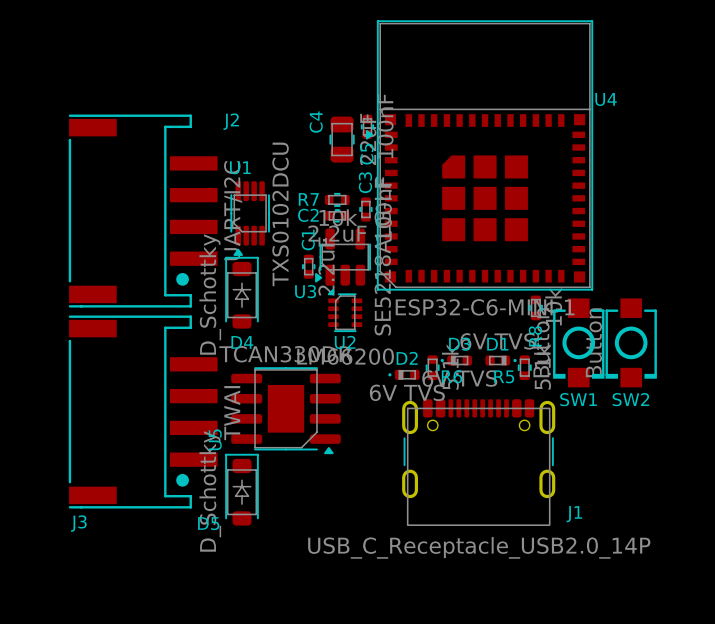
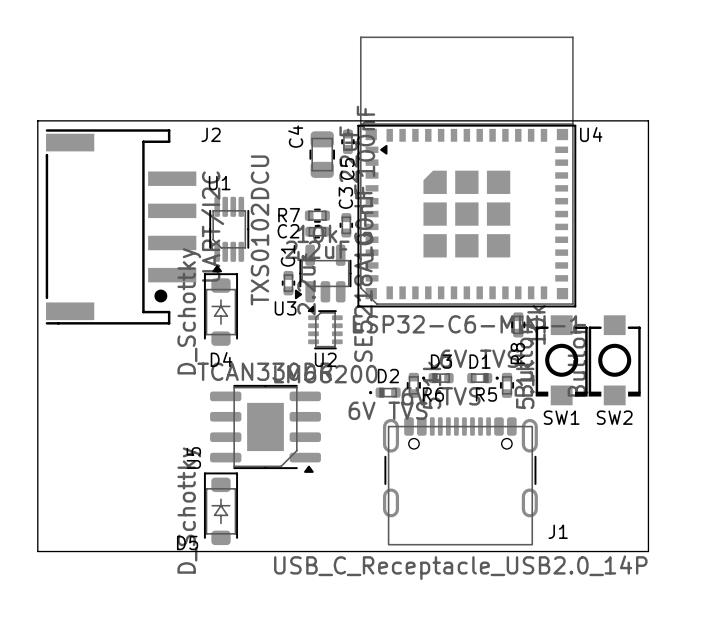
U4 footprint: [365, 20, 594, 291] -> [357, 36, 577, 308]
board edge: none -> (37, 120) (37, 551) (648, 551) (648, 120) (37, 120)
J3: TWAI (143, 412) -> none

